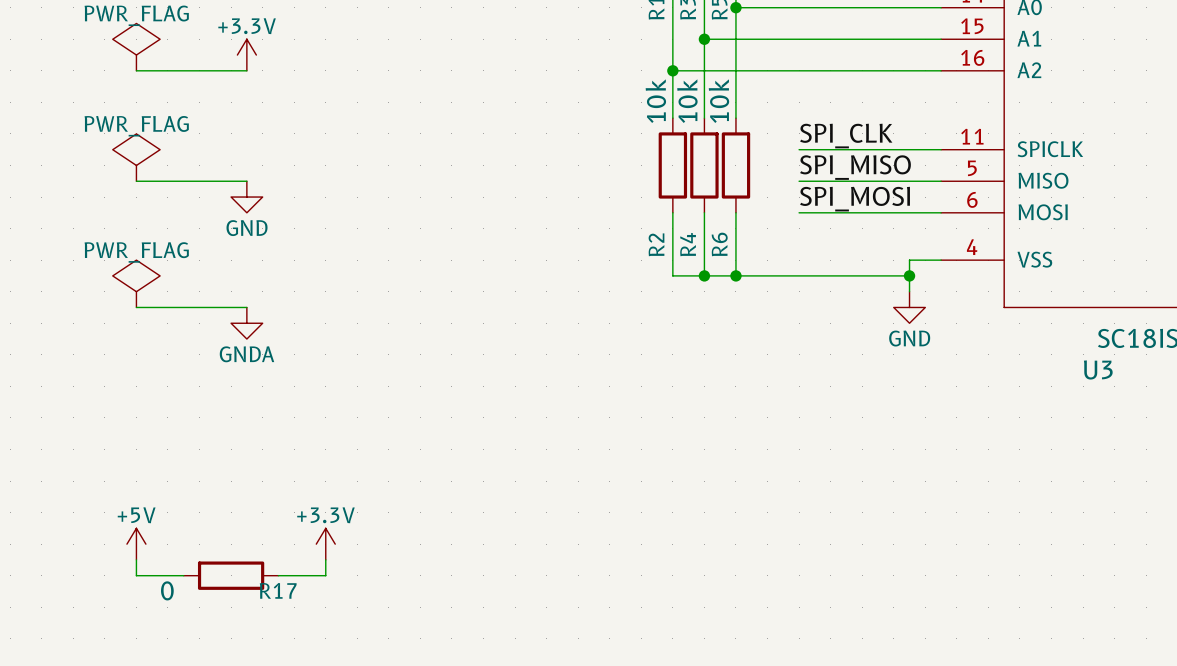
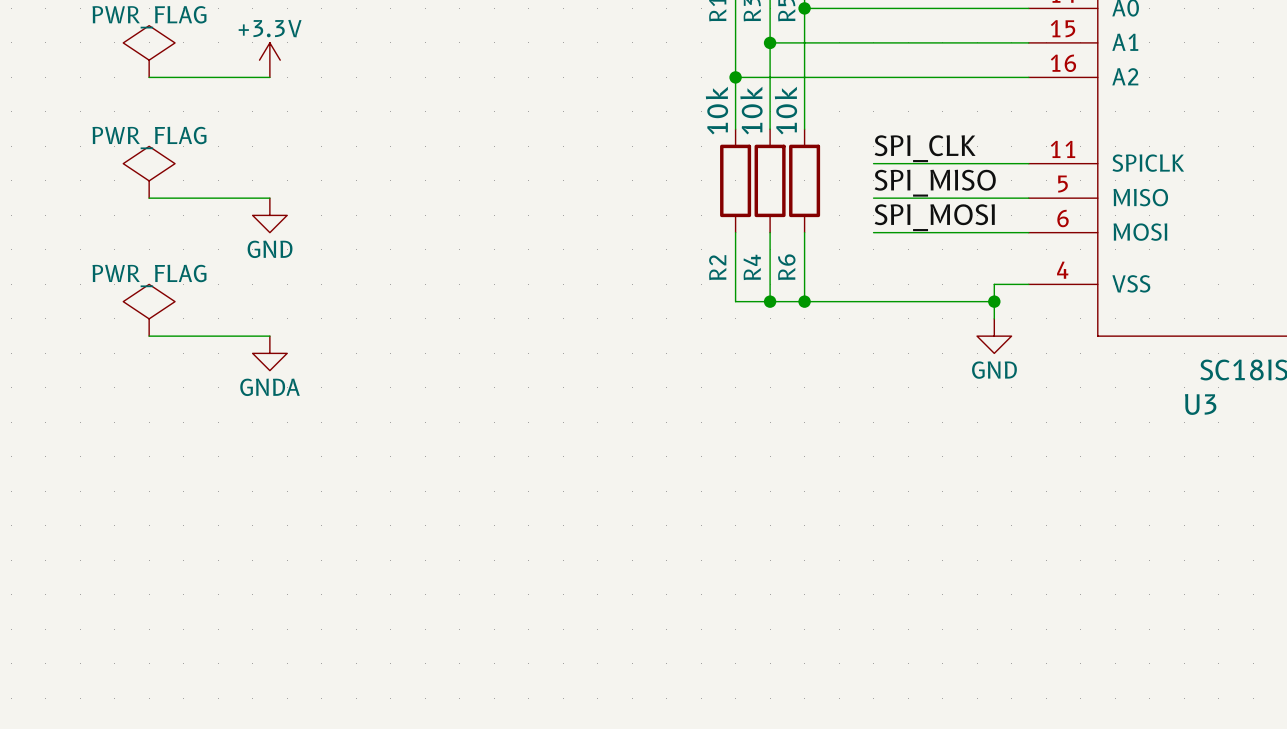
power symbol: +5V (136, 544) -> none
power symbol: +3.3V (325, 544) -> none
wire: (136, 559) (136, 575) (183, 575) -> none
wire: (325, 559) (325, 575) (278, 575) -> none
R17: (231, 575) -> none

